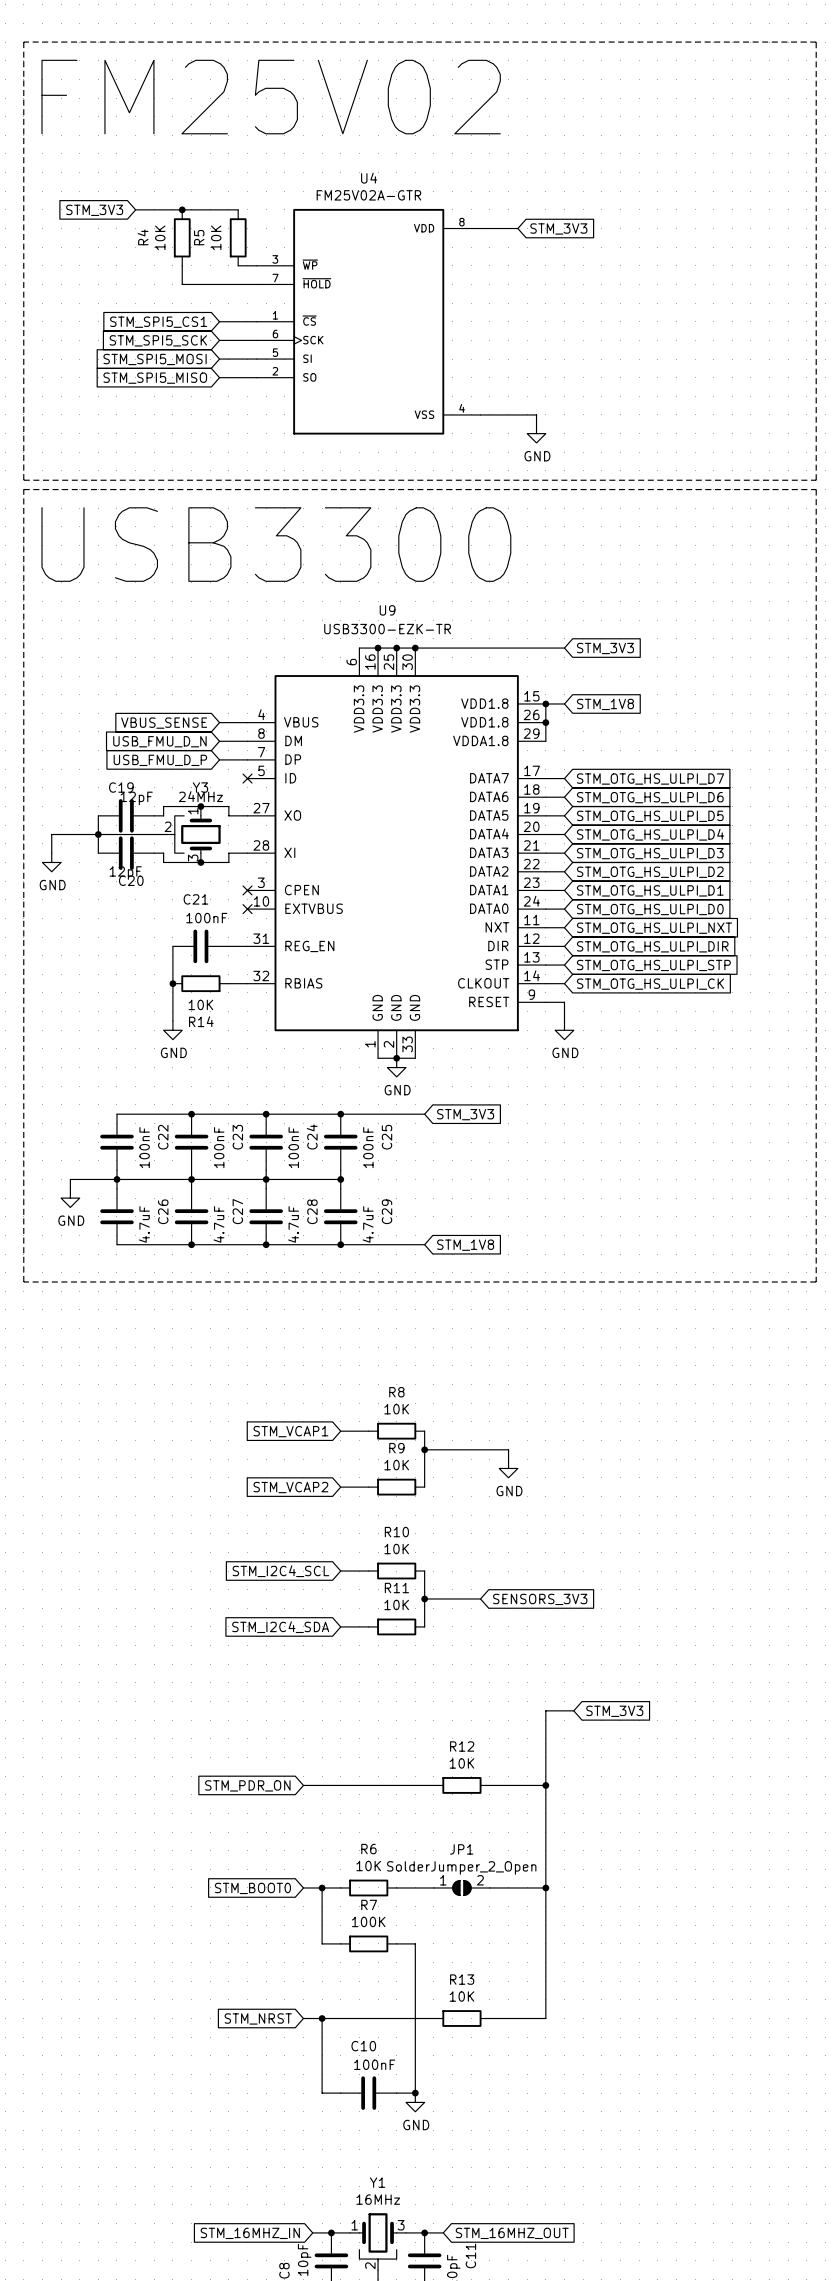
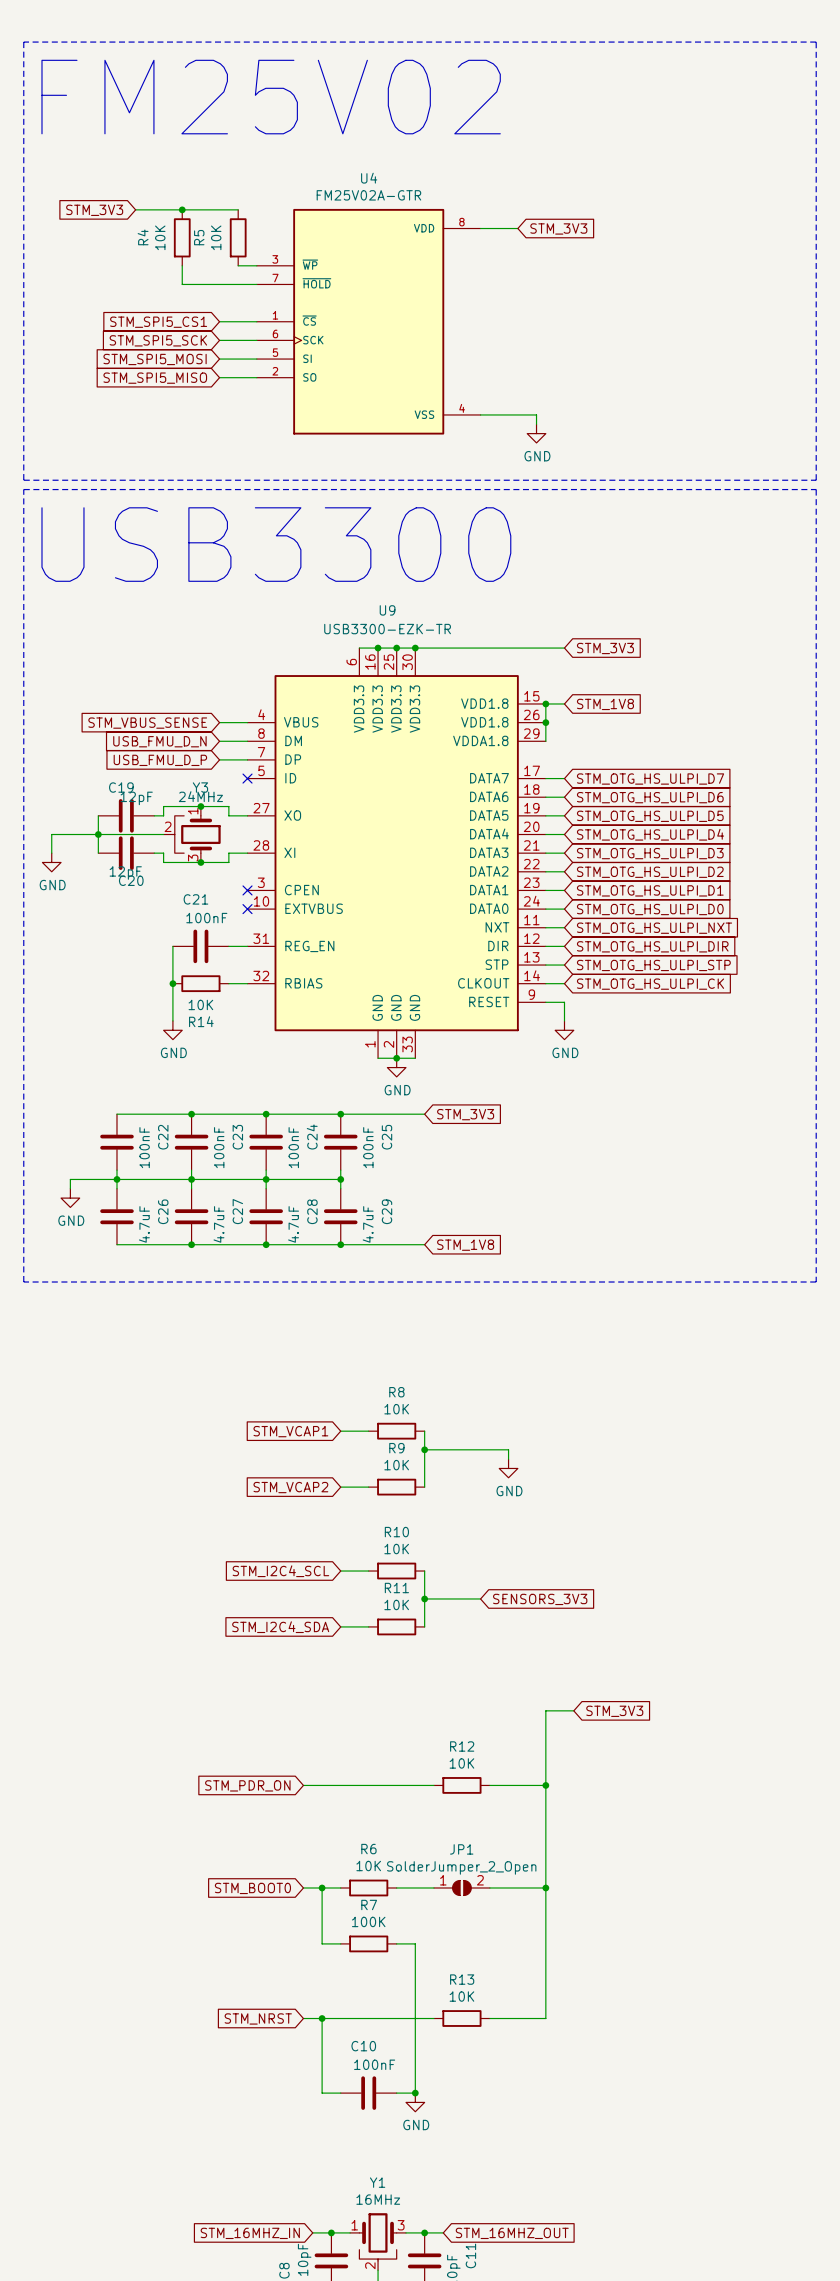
global label: VBUS_SENSE (164, 723) -> STM_VBUS_SENSE (147, 723)

